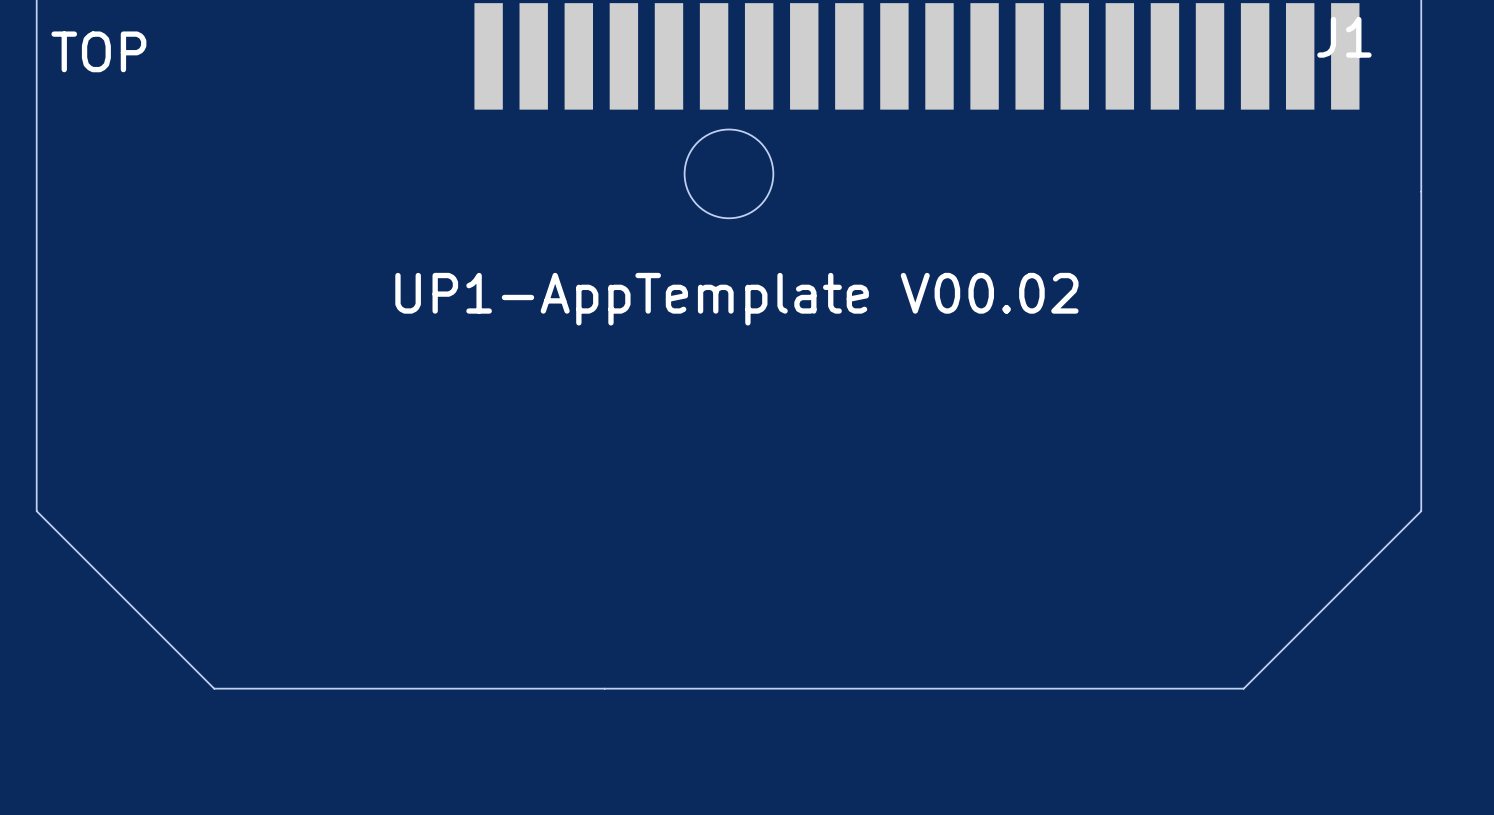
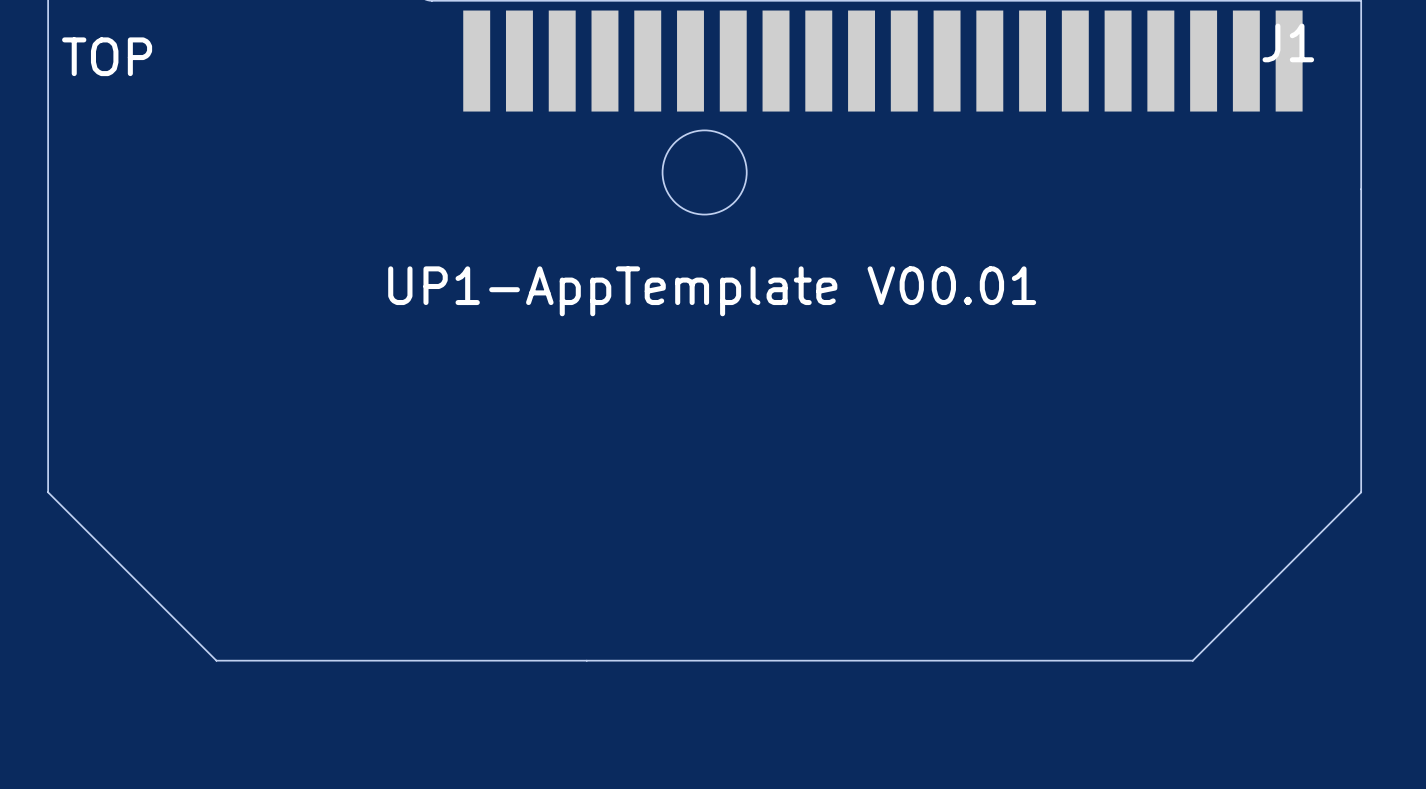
text: UP1-AppTemplate V00.02 (736, 299) -> UP1-AppTemplate V00.01 (712, 291)

